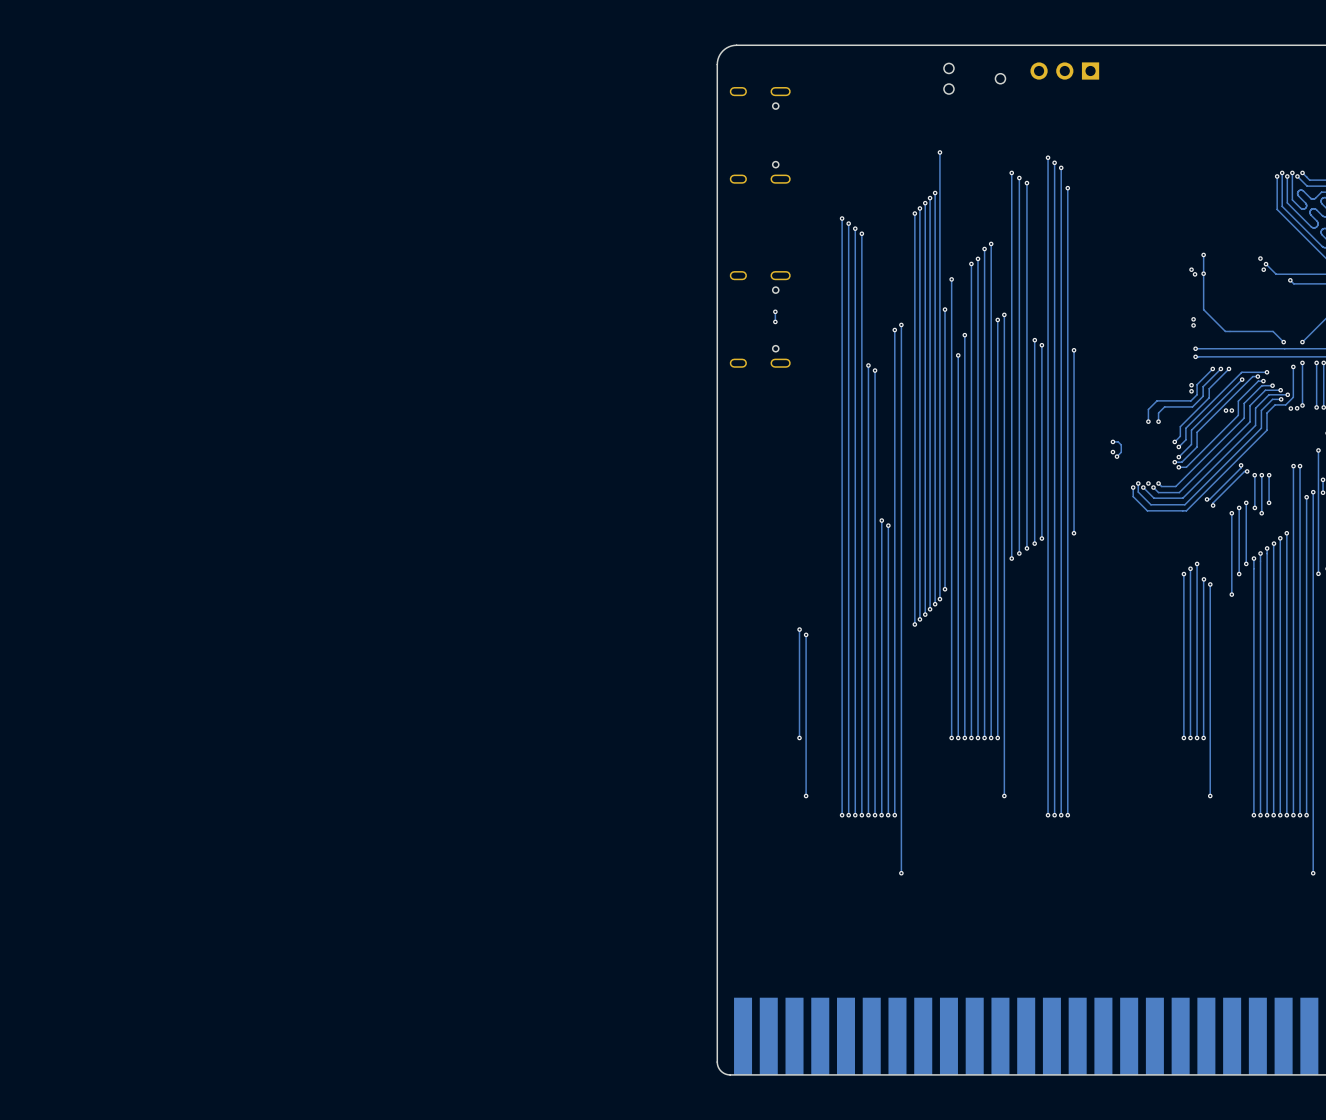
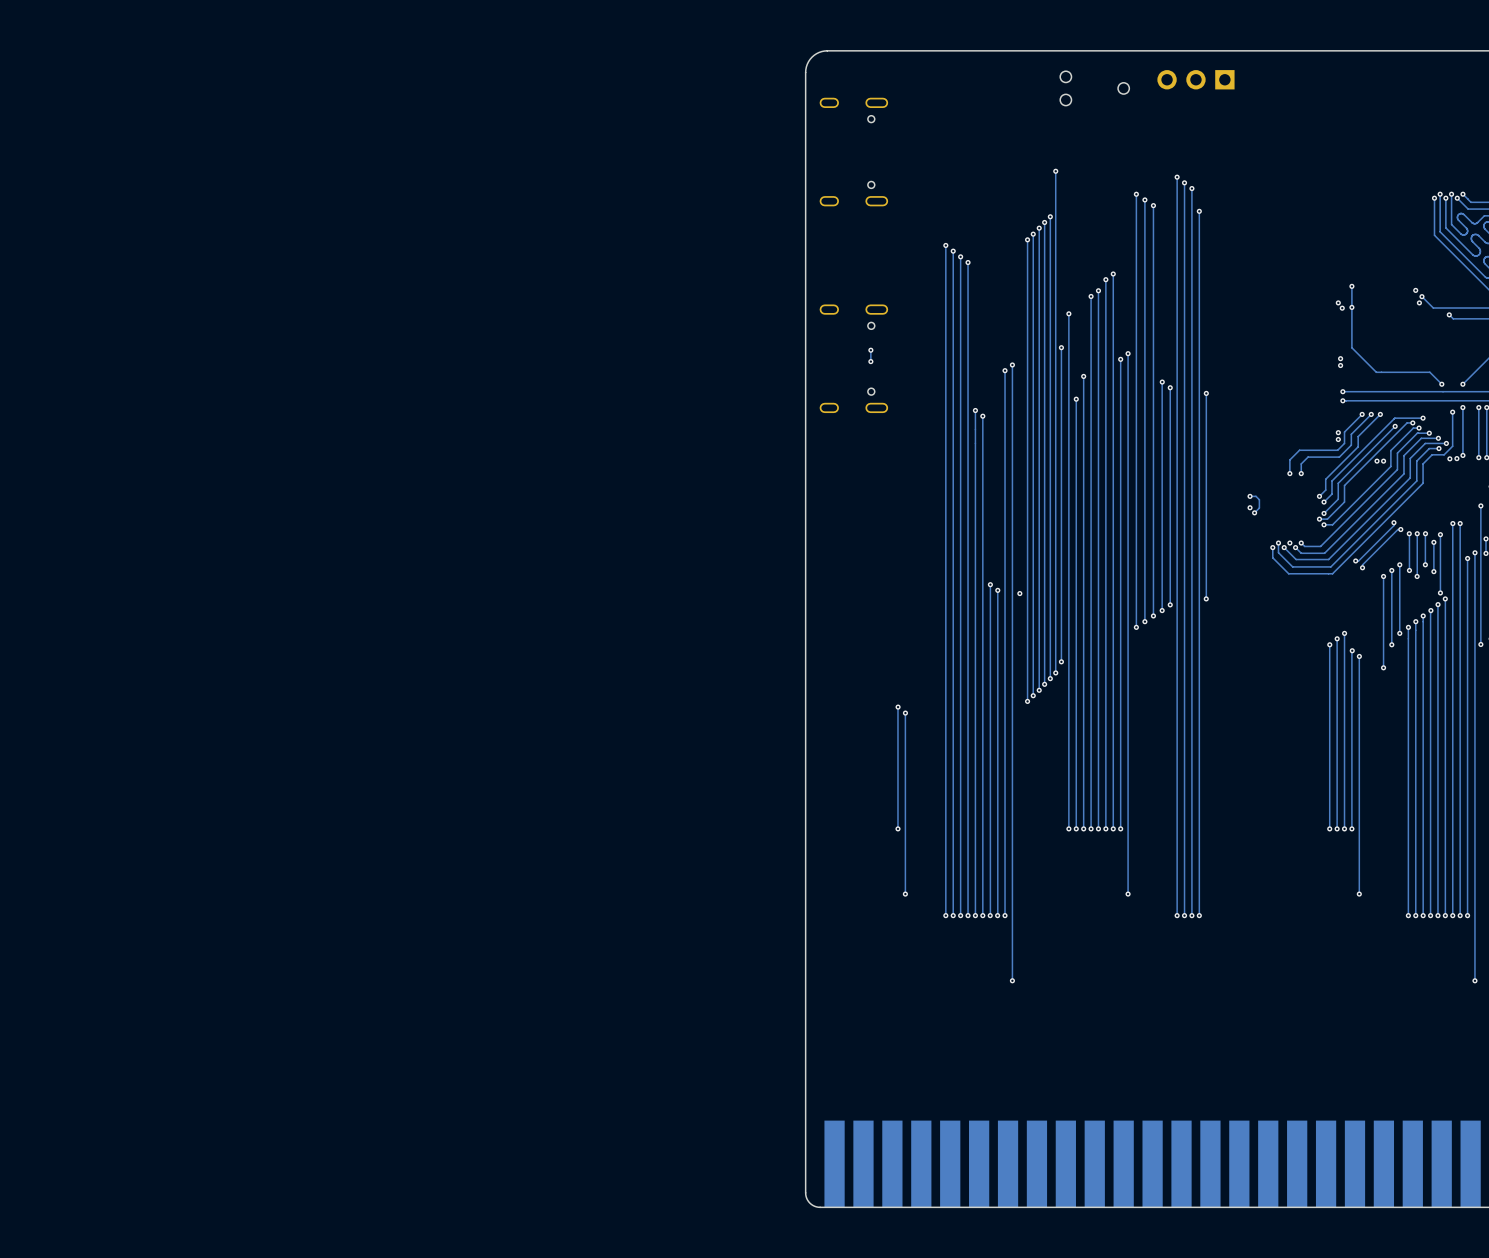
track: none -> (1440, 534) (1440, 592)
via: none -> (1440, 534)
track: none -> (1433, 542) (1433, 571)
via: none -> (1433, 542)
via: none -> (1433, 571)
via: none -> (1440, 592)
via: none -> (1019, 593)

